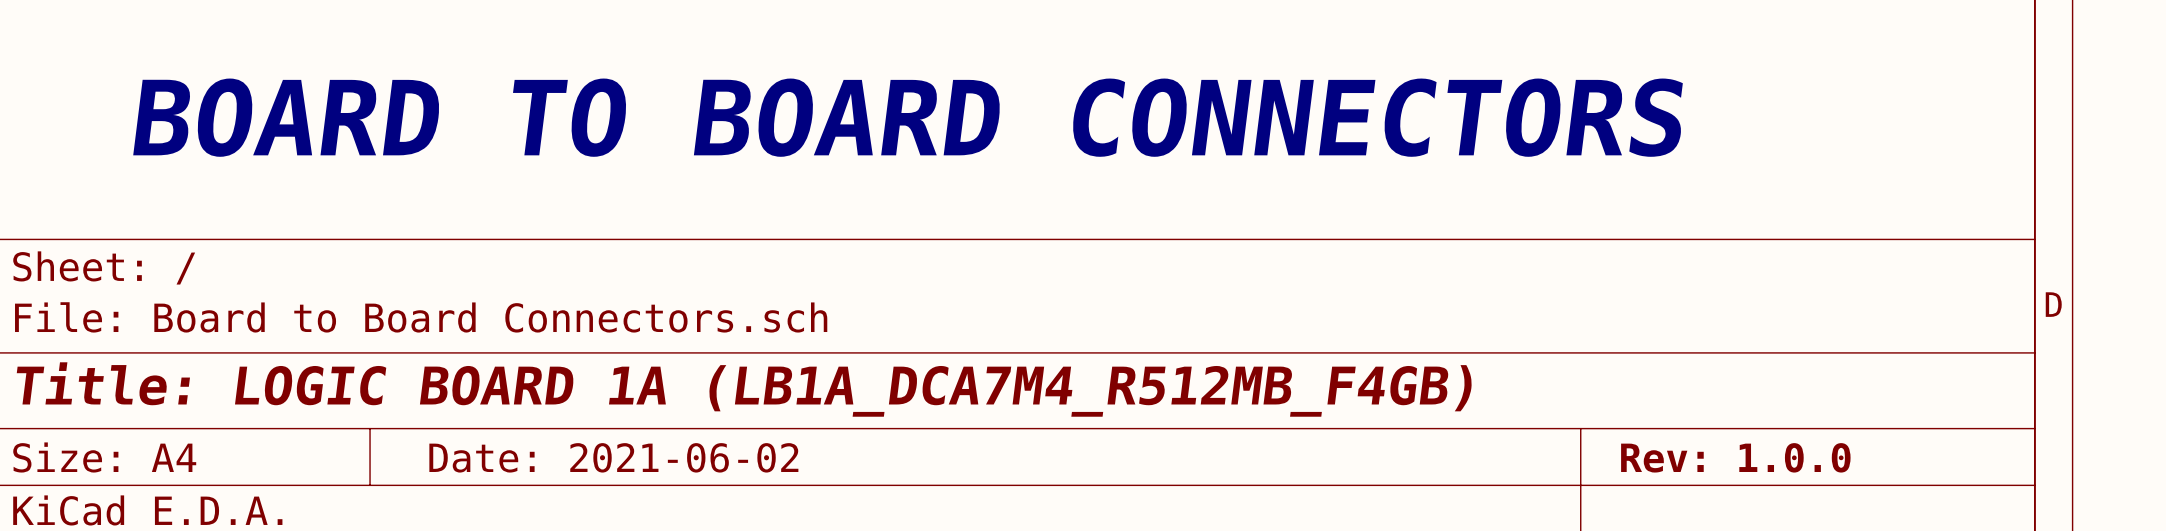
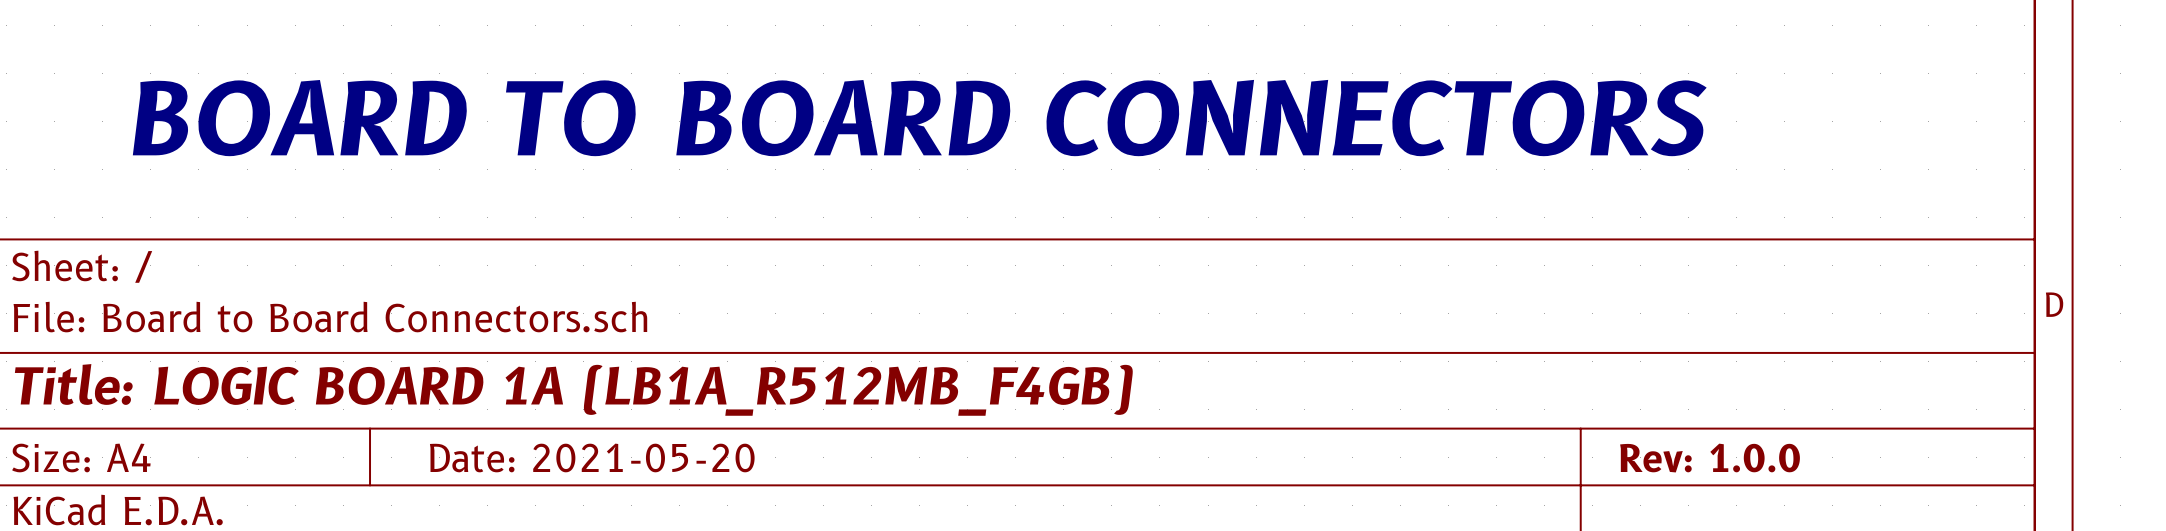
title block: Title: LOGIC BOARD 1A (LB1A_DCA7M4_R512MB_F4GB) (744, 389) -> Title: LOGIC BOARD 1A (LB1A_R512MB_F4GB) (573, 389)
title block: Date: 2021-06-02 (613, 457) -> Date: 2021-05-20 (592, 457)

